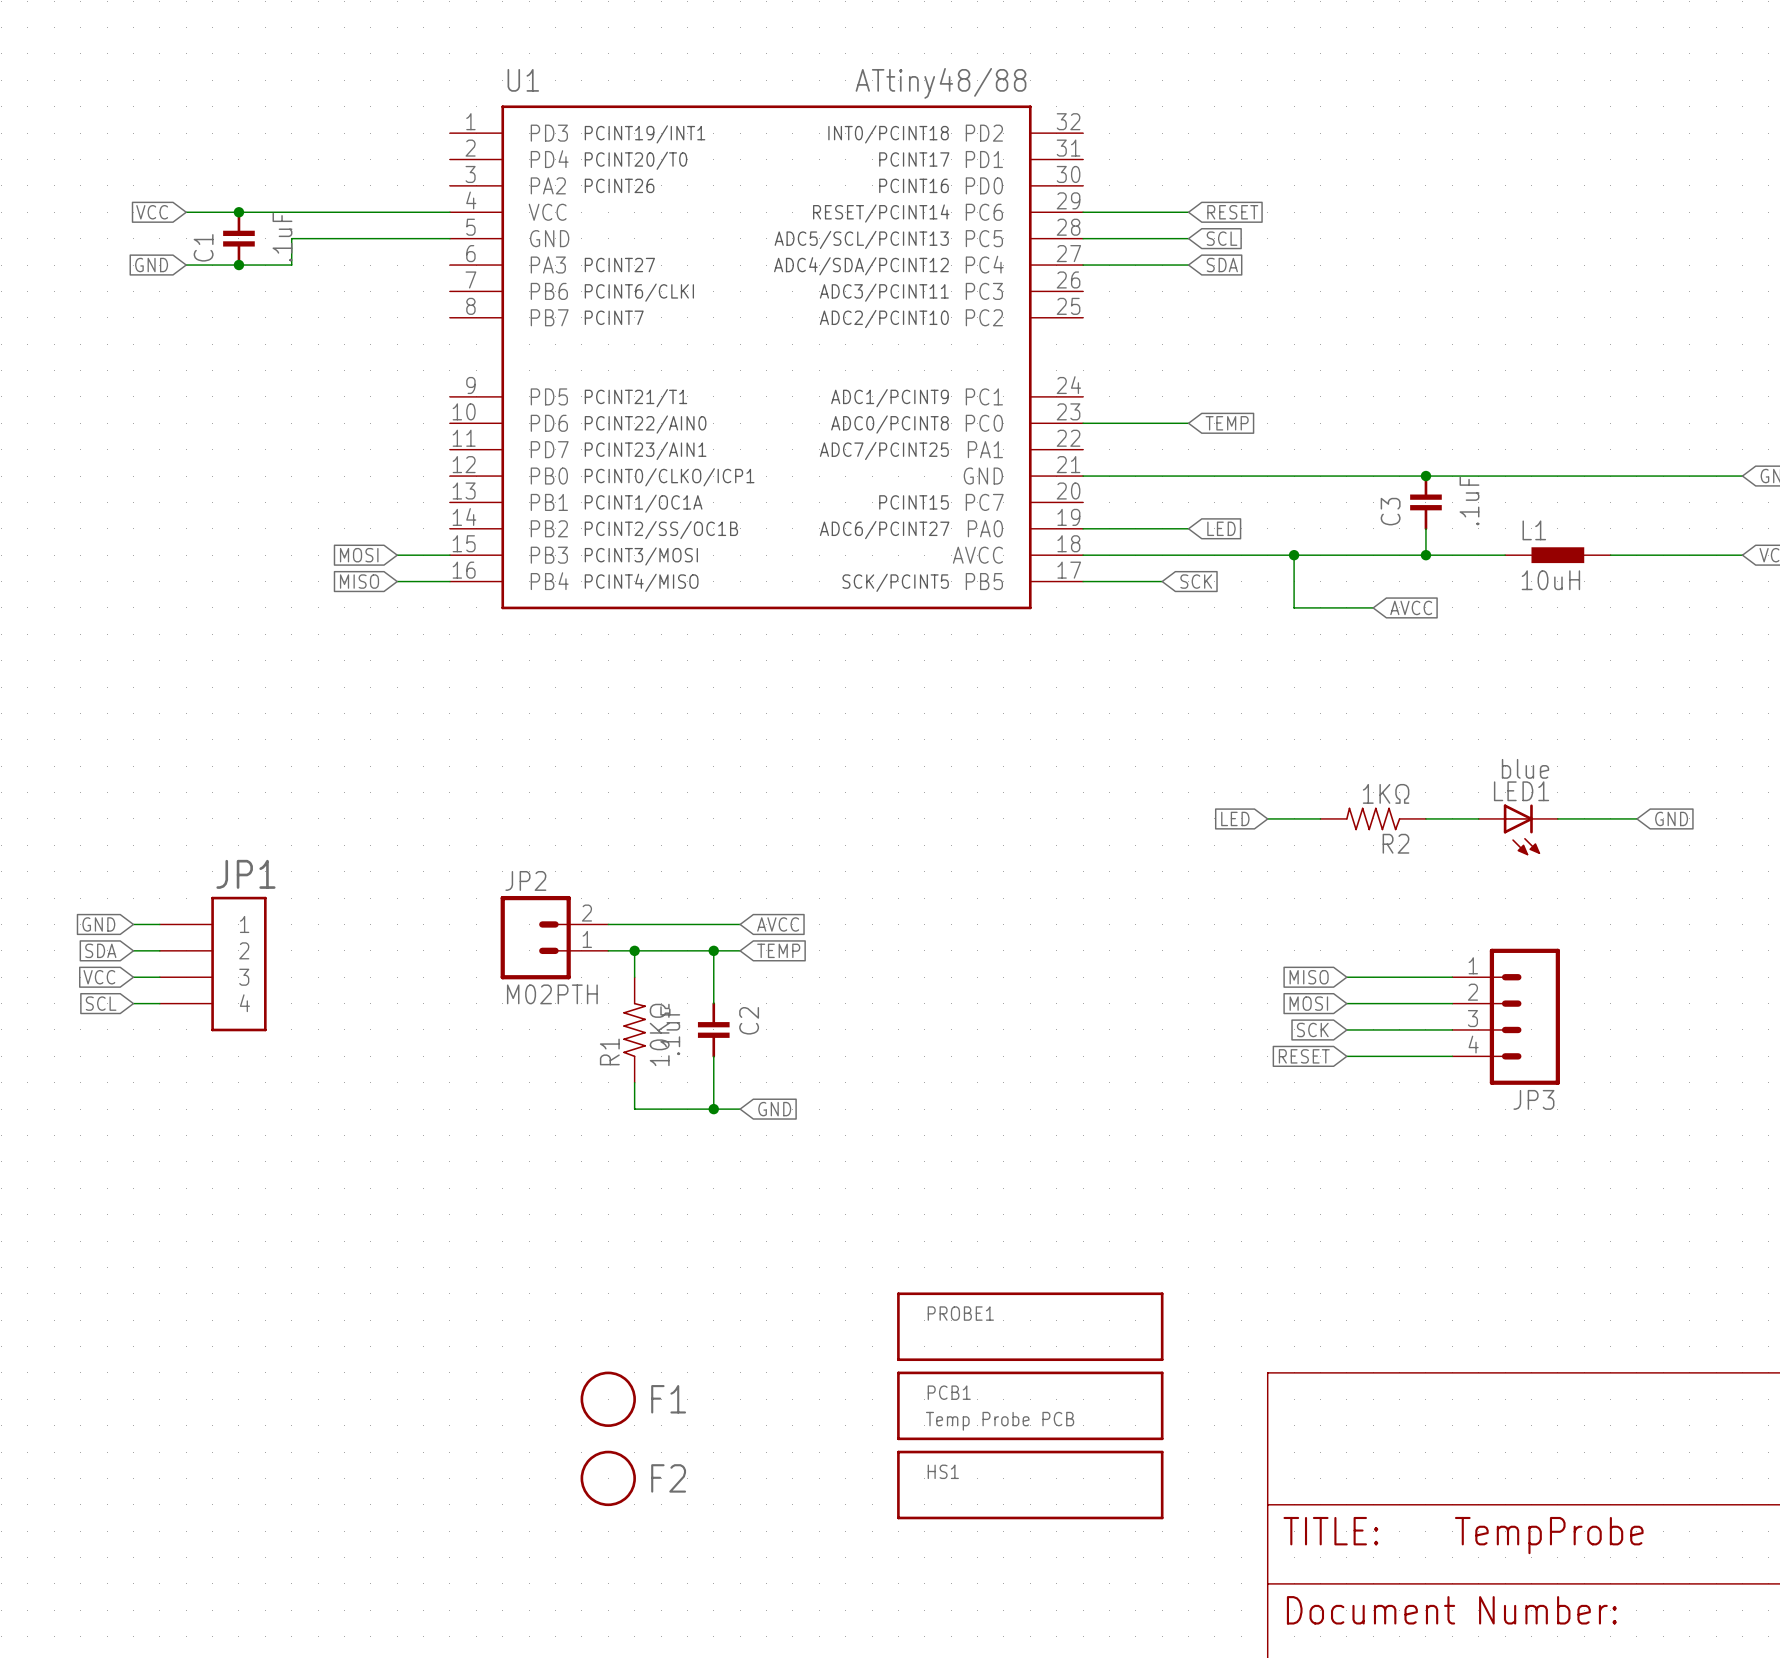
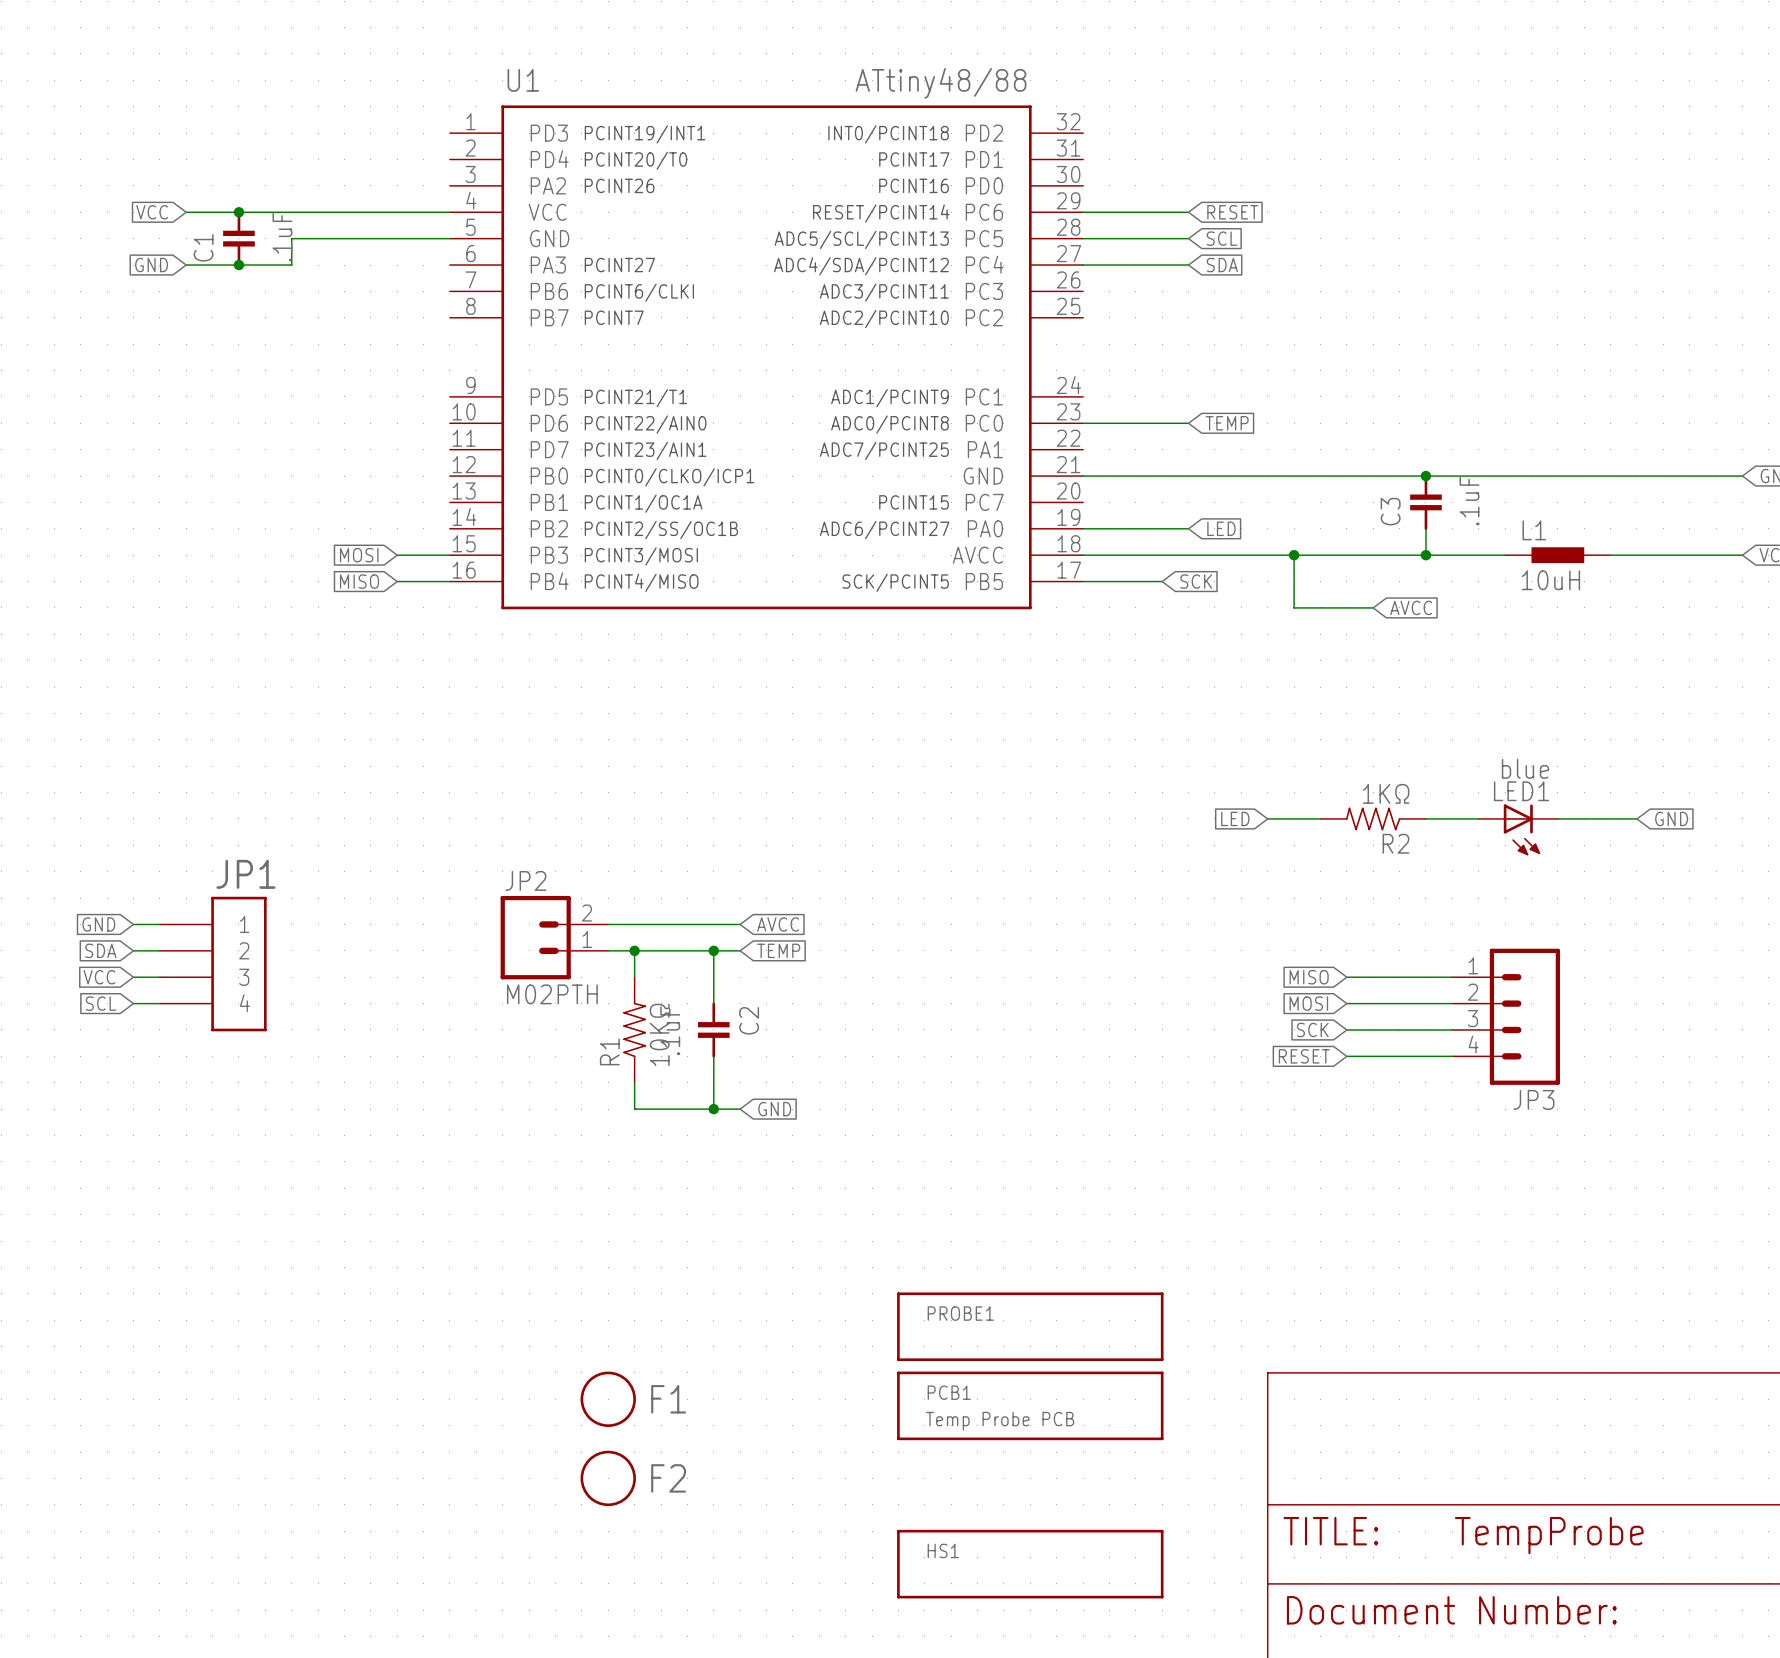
HS1 position: (1030, 1485) -> (1030, 1564)

